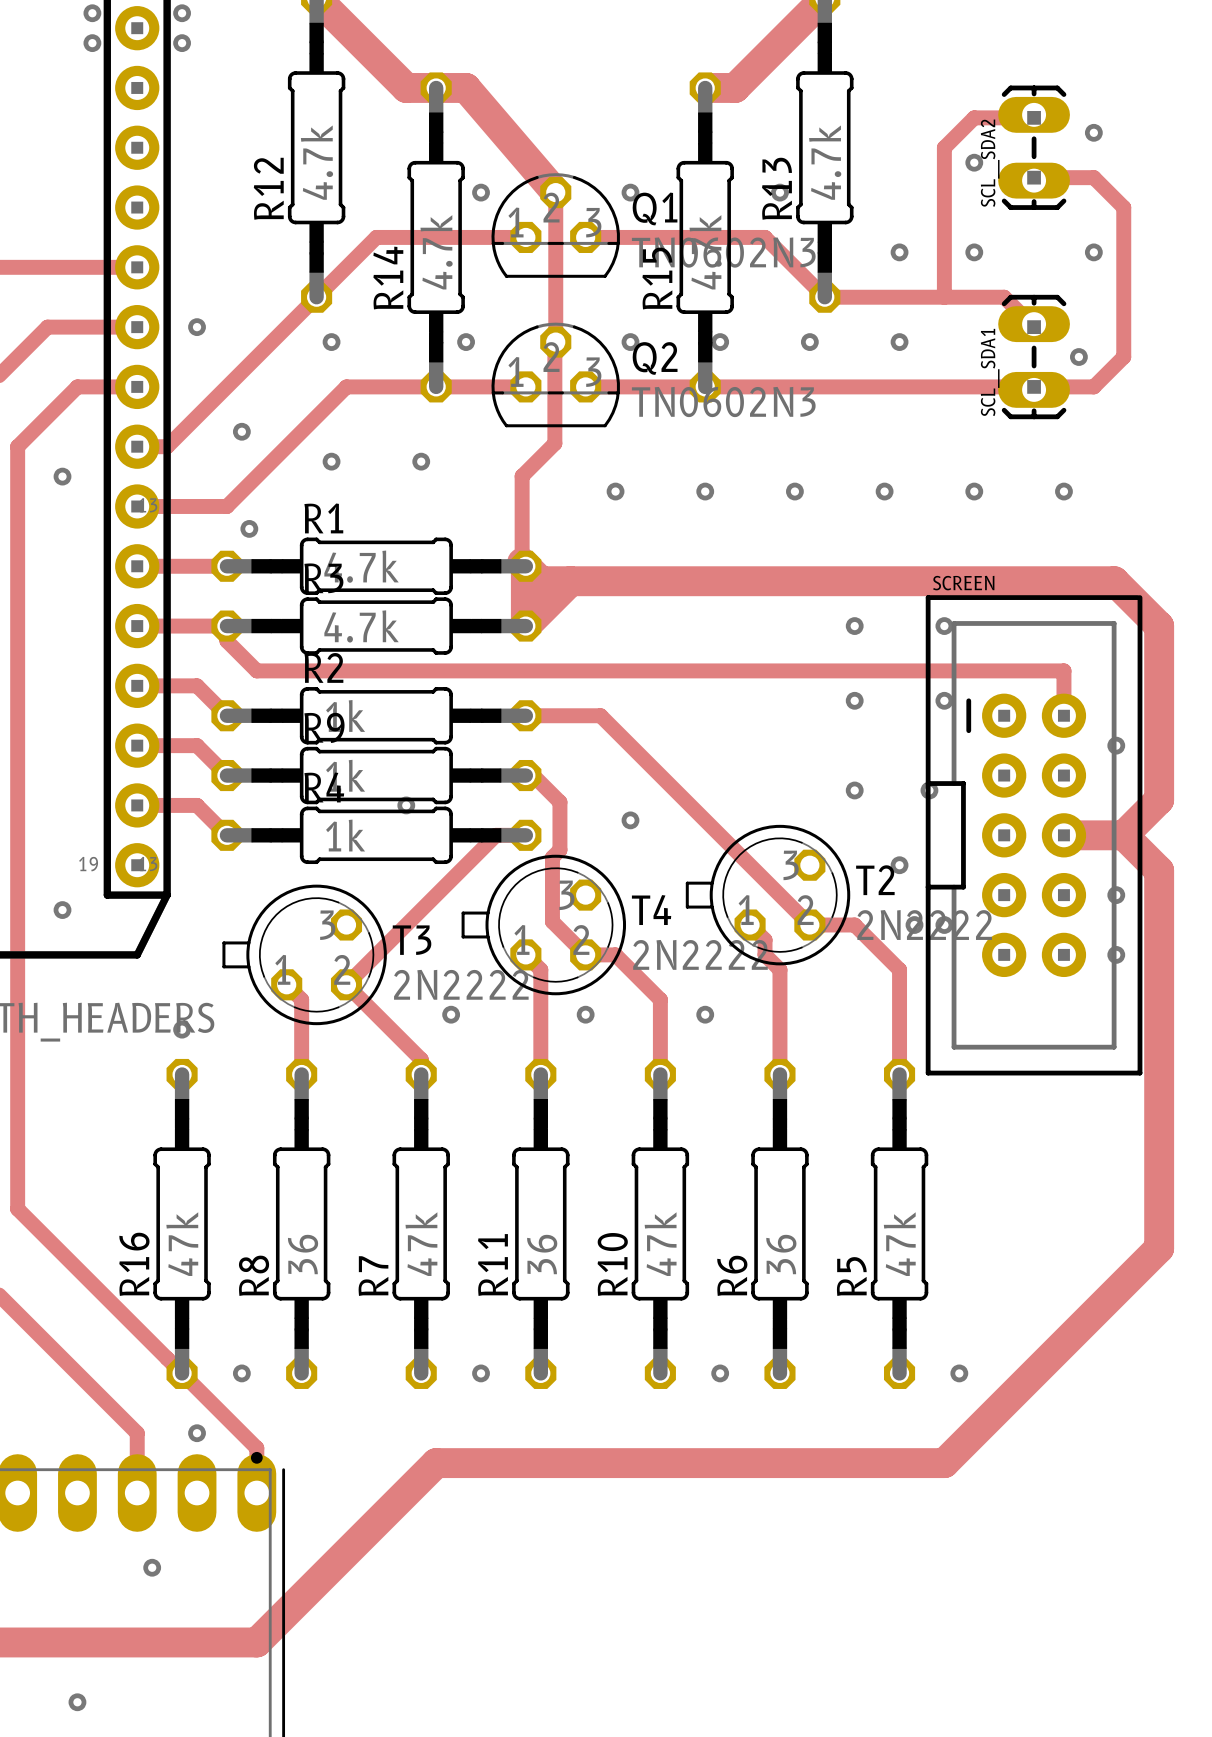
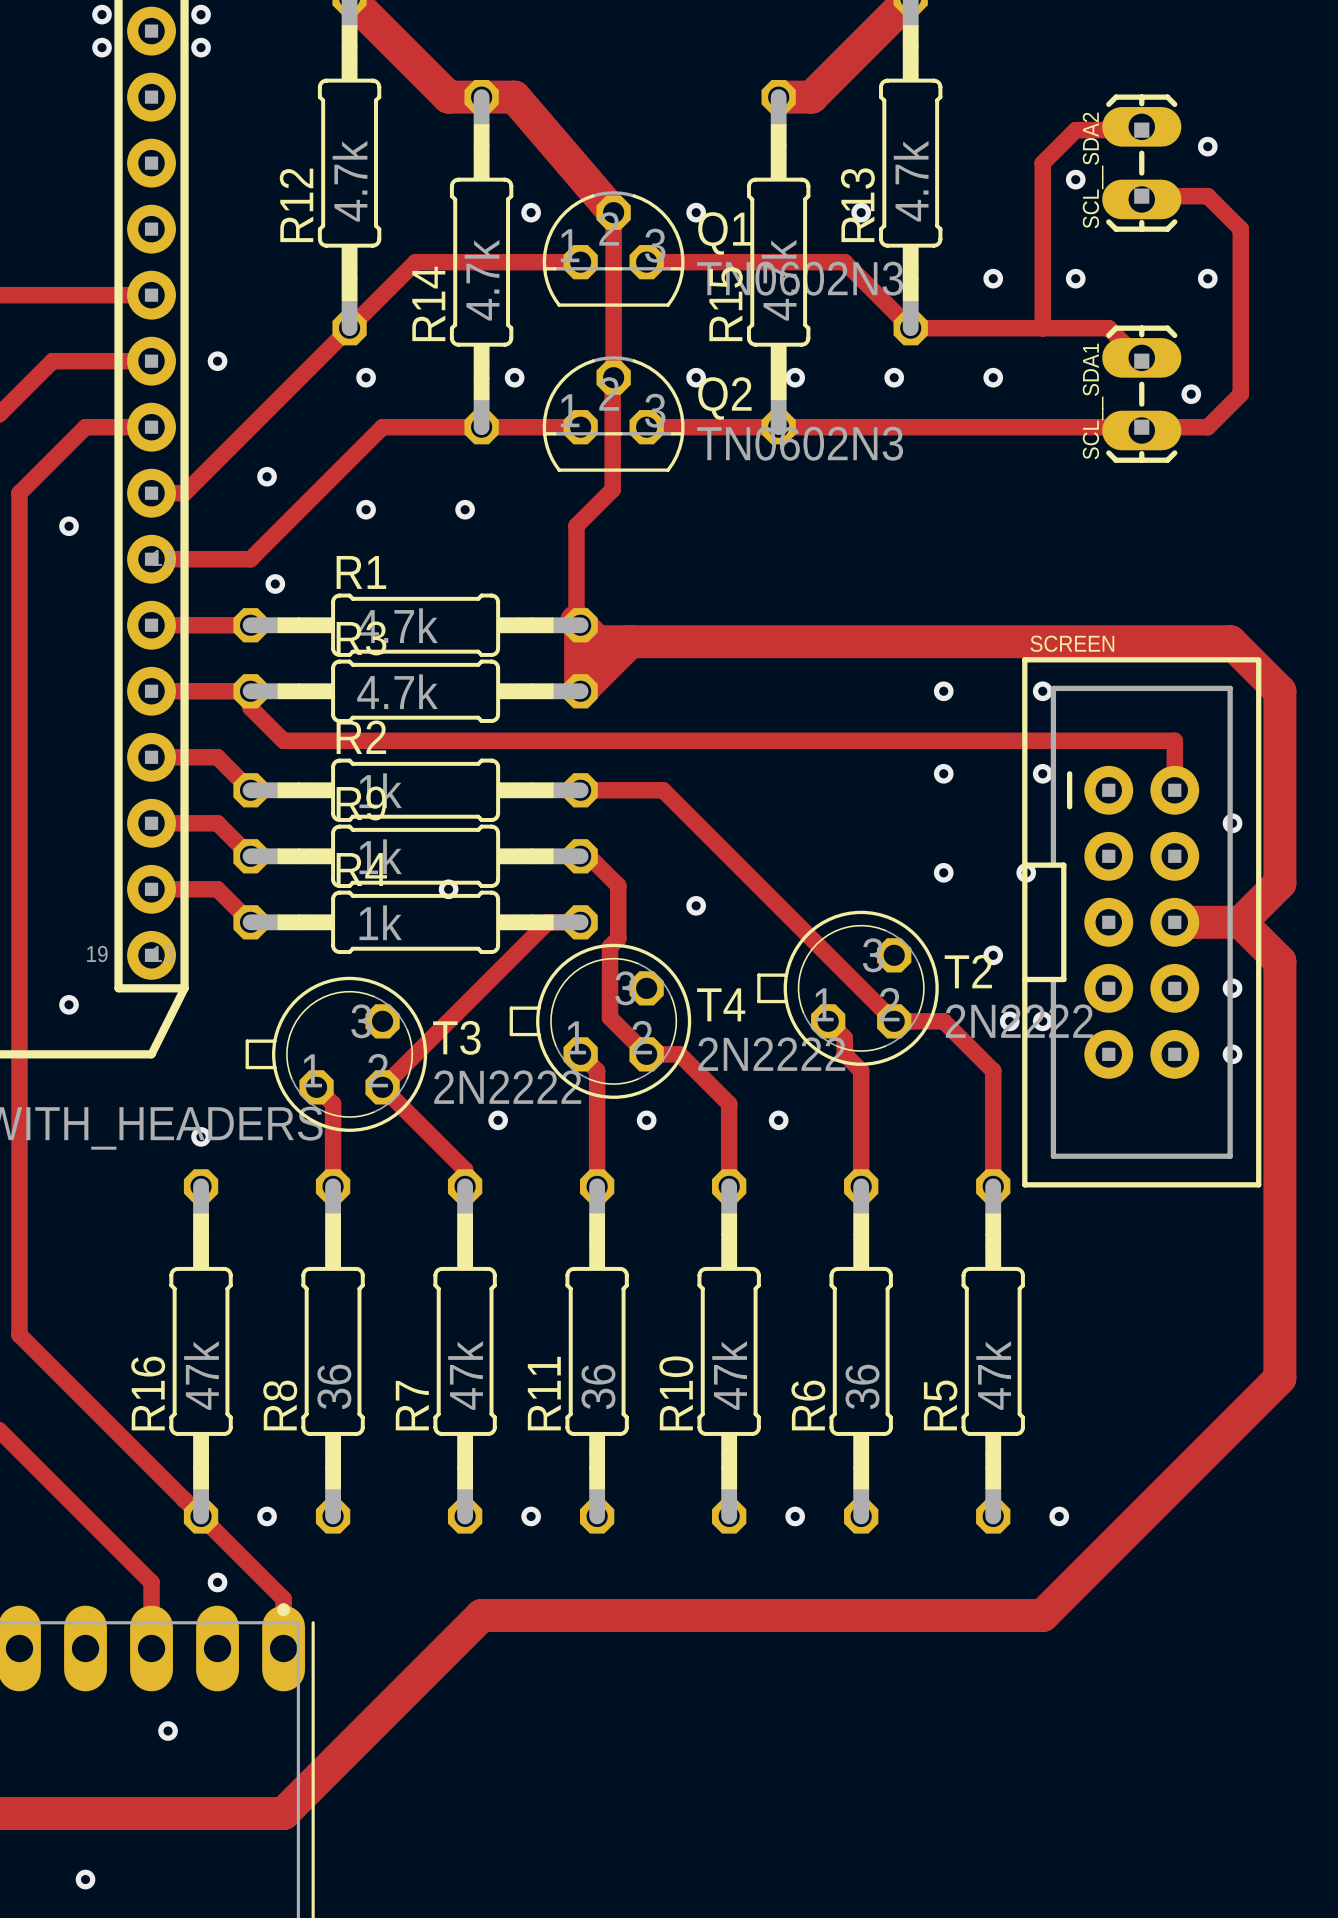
via: (615, 491) -> none
via: (705, 491) -> none
via: (794, 491) -> none
via: (884, 491) -> none
via: (974, 491) -> none
via: (1063, 491) -> none

